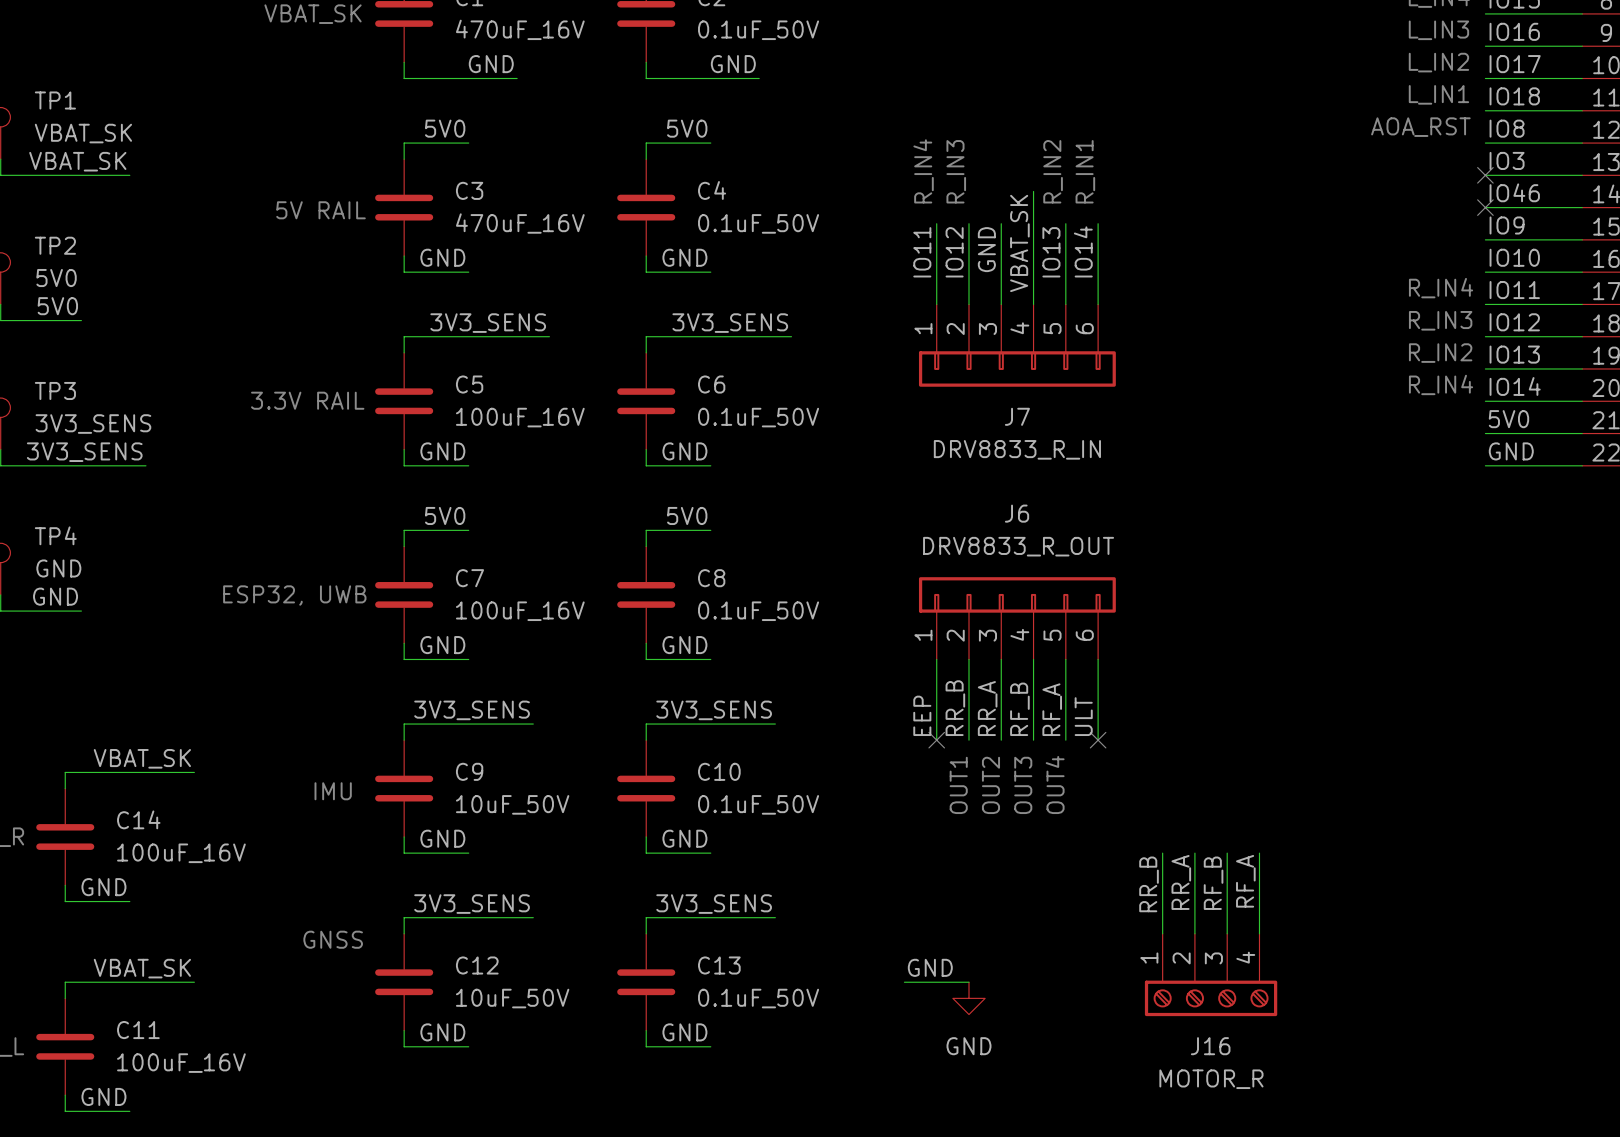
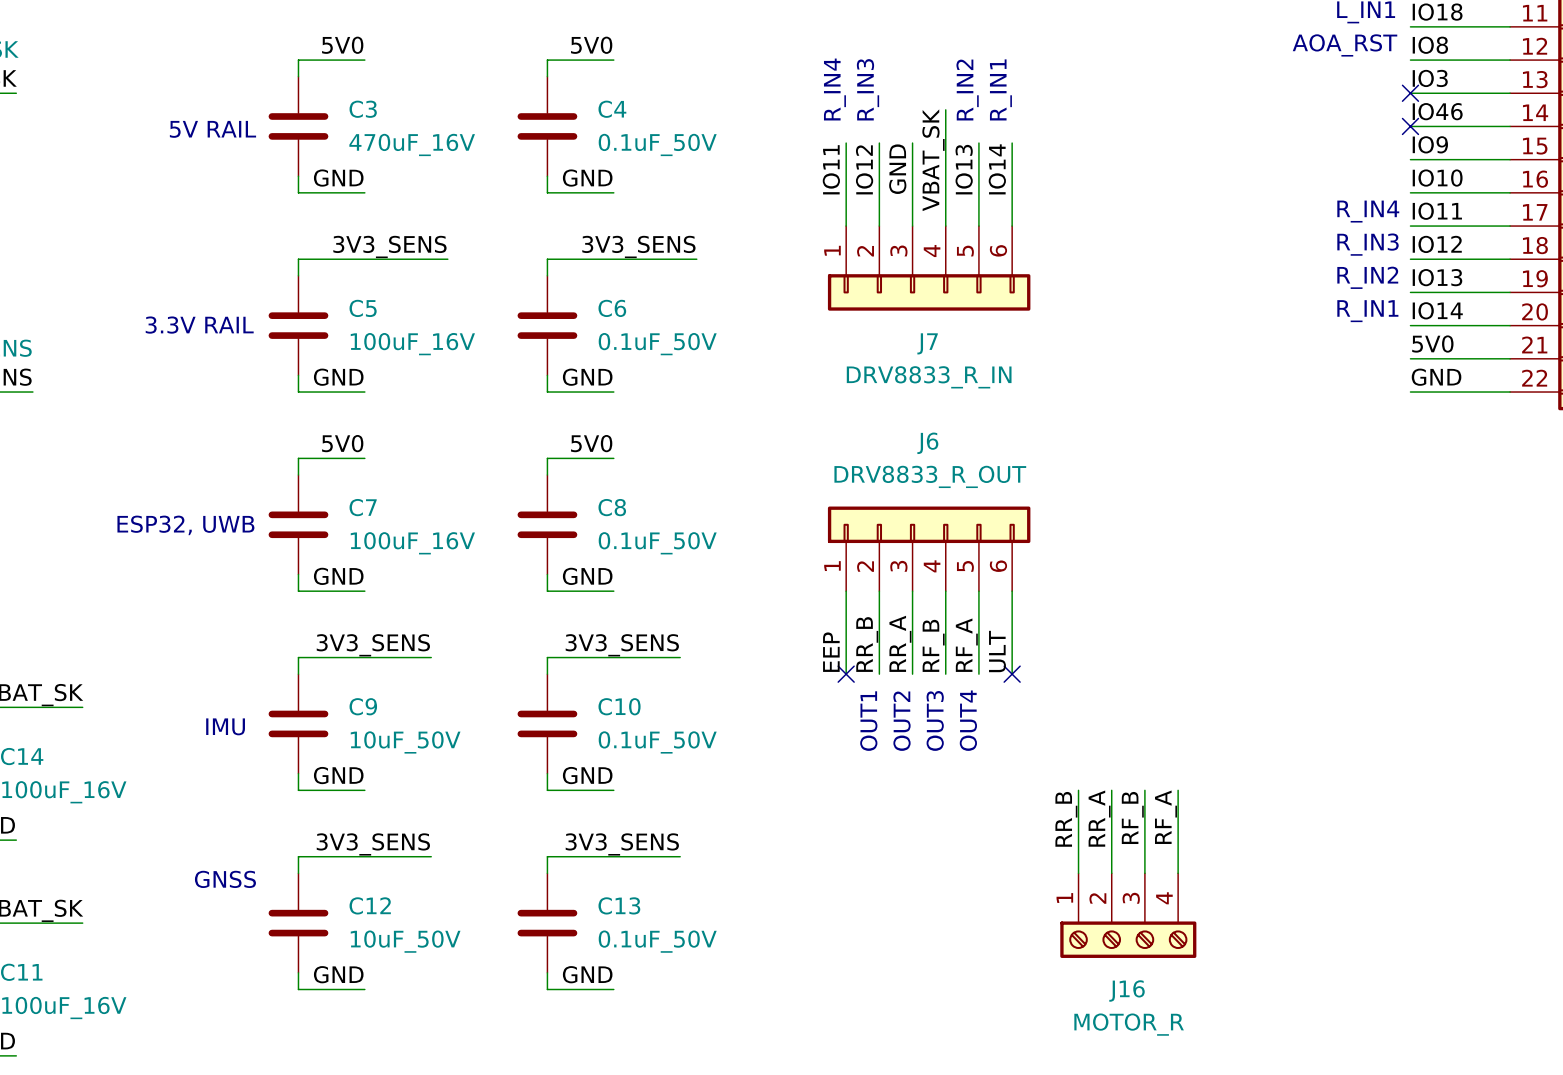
text: R_IN4 (1441, 384) -> R_IN1 (1367, 311)
label: GND (930, 967) -> none
wire: (904, 982) (968, 982) -> none
power symbol: GND (968, 998) -> none

